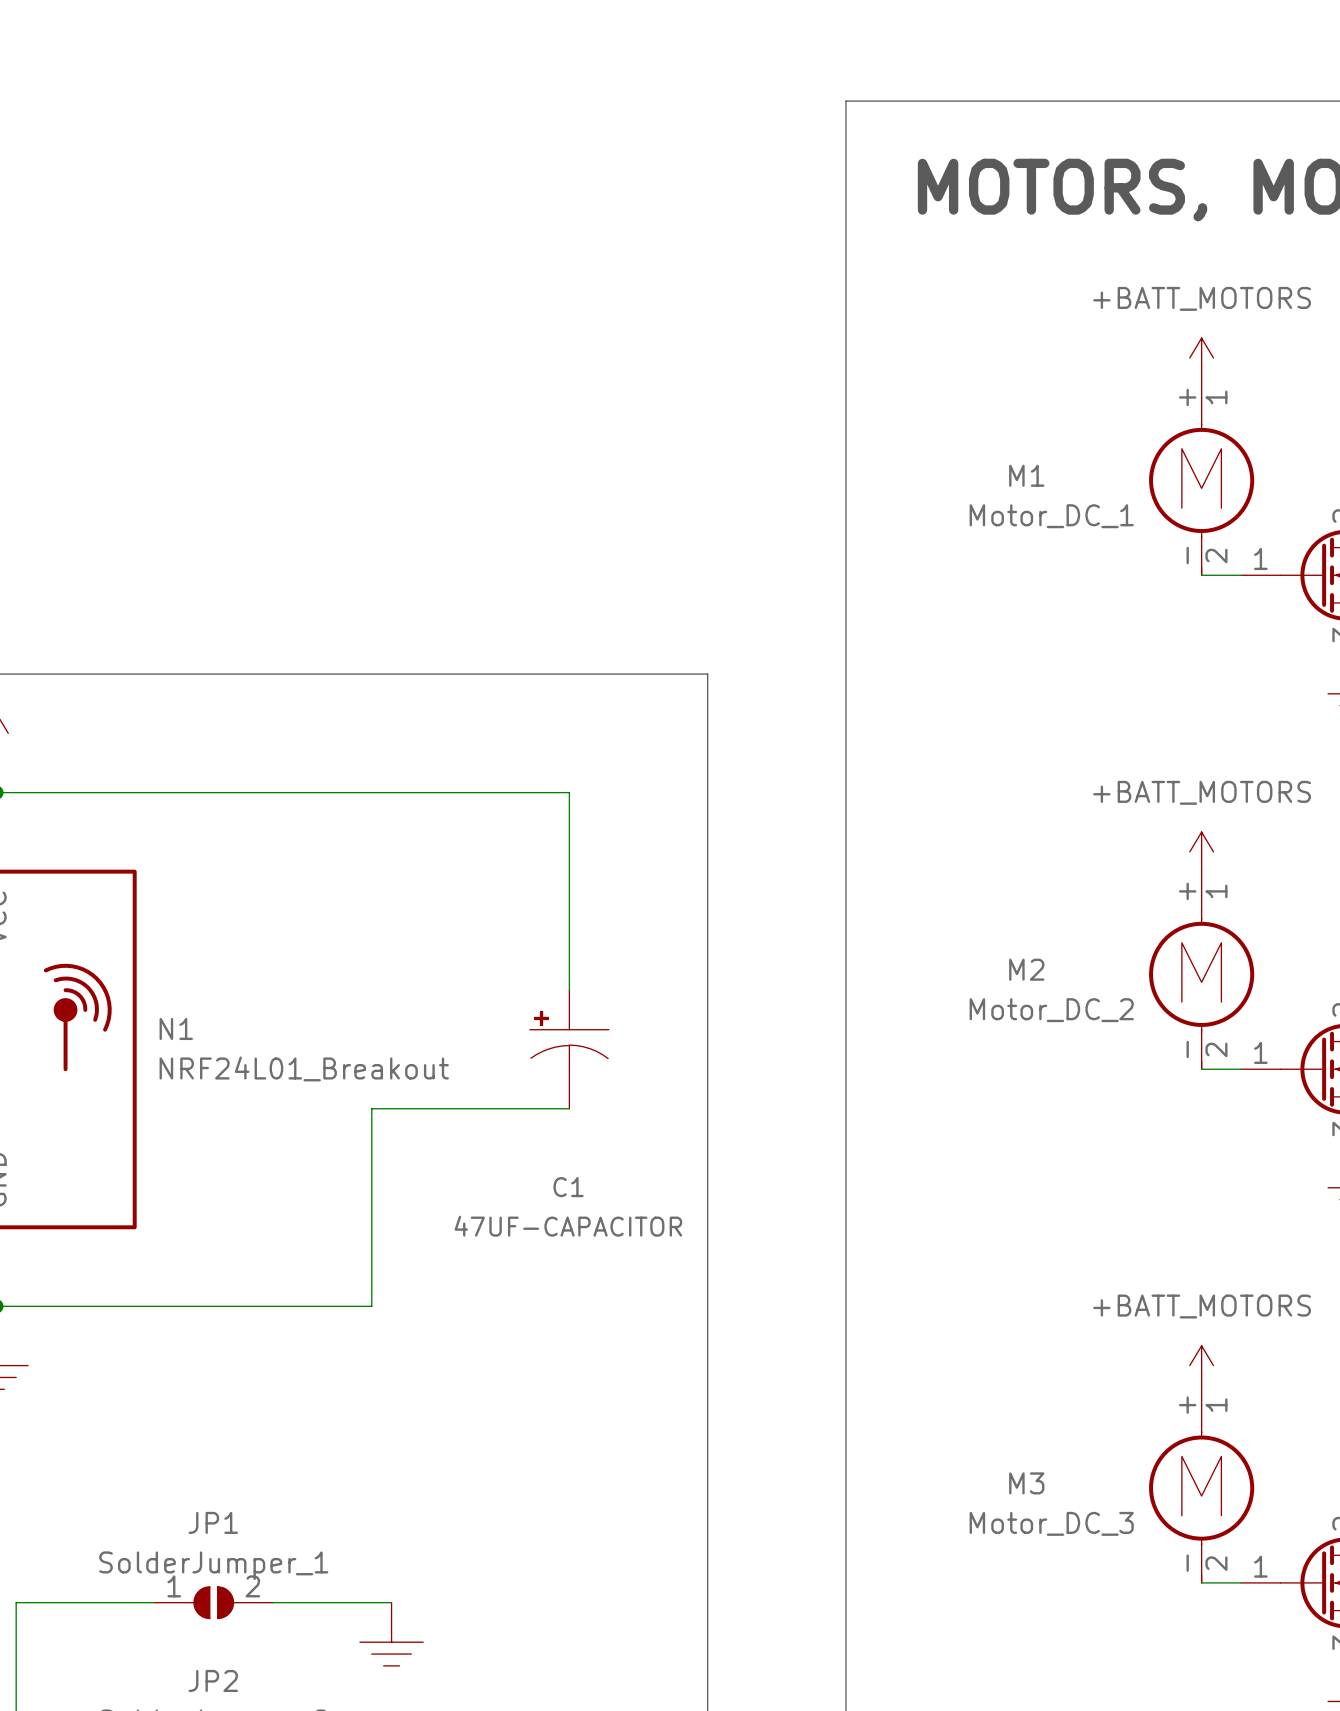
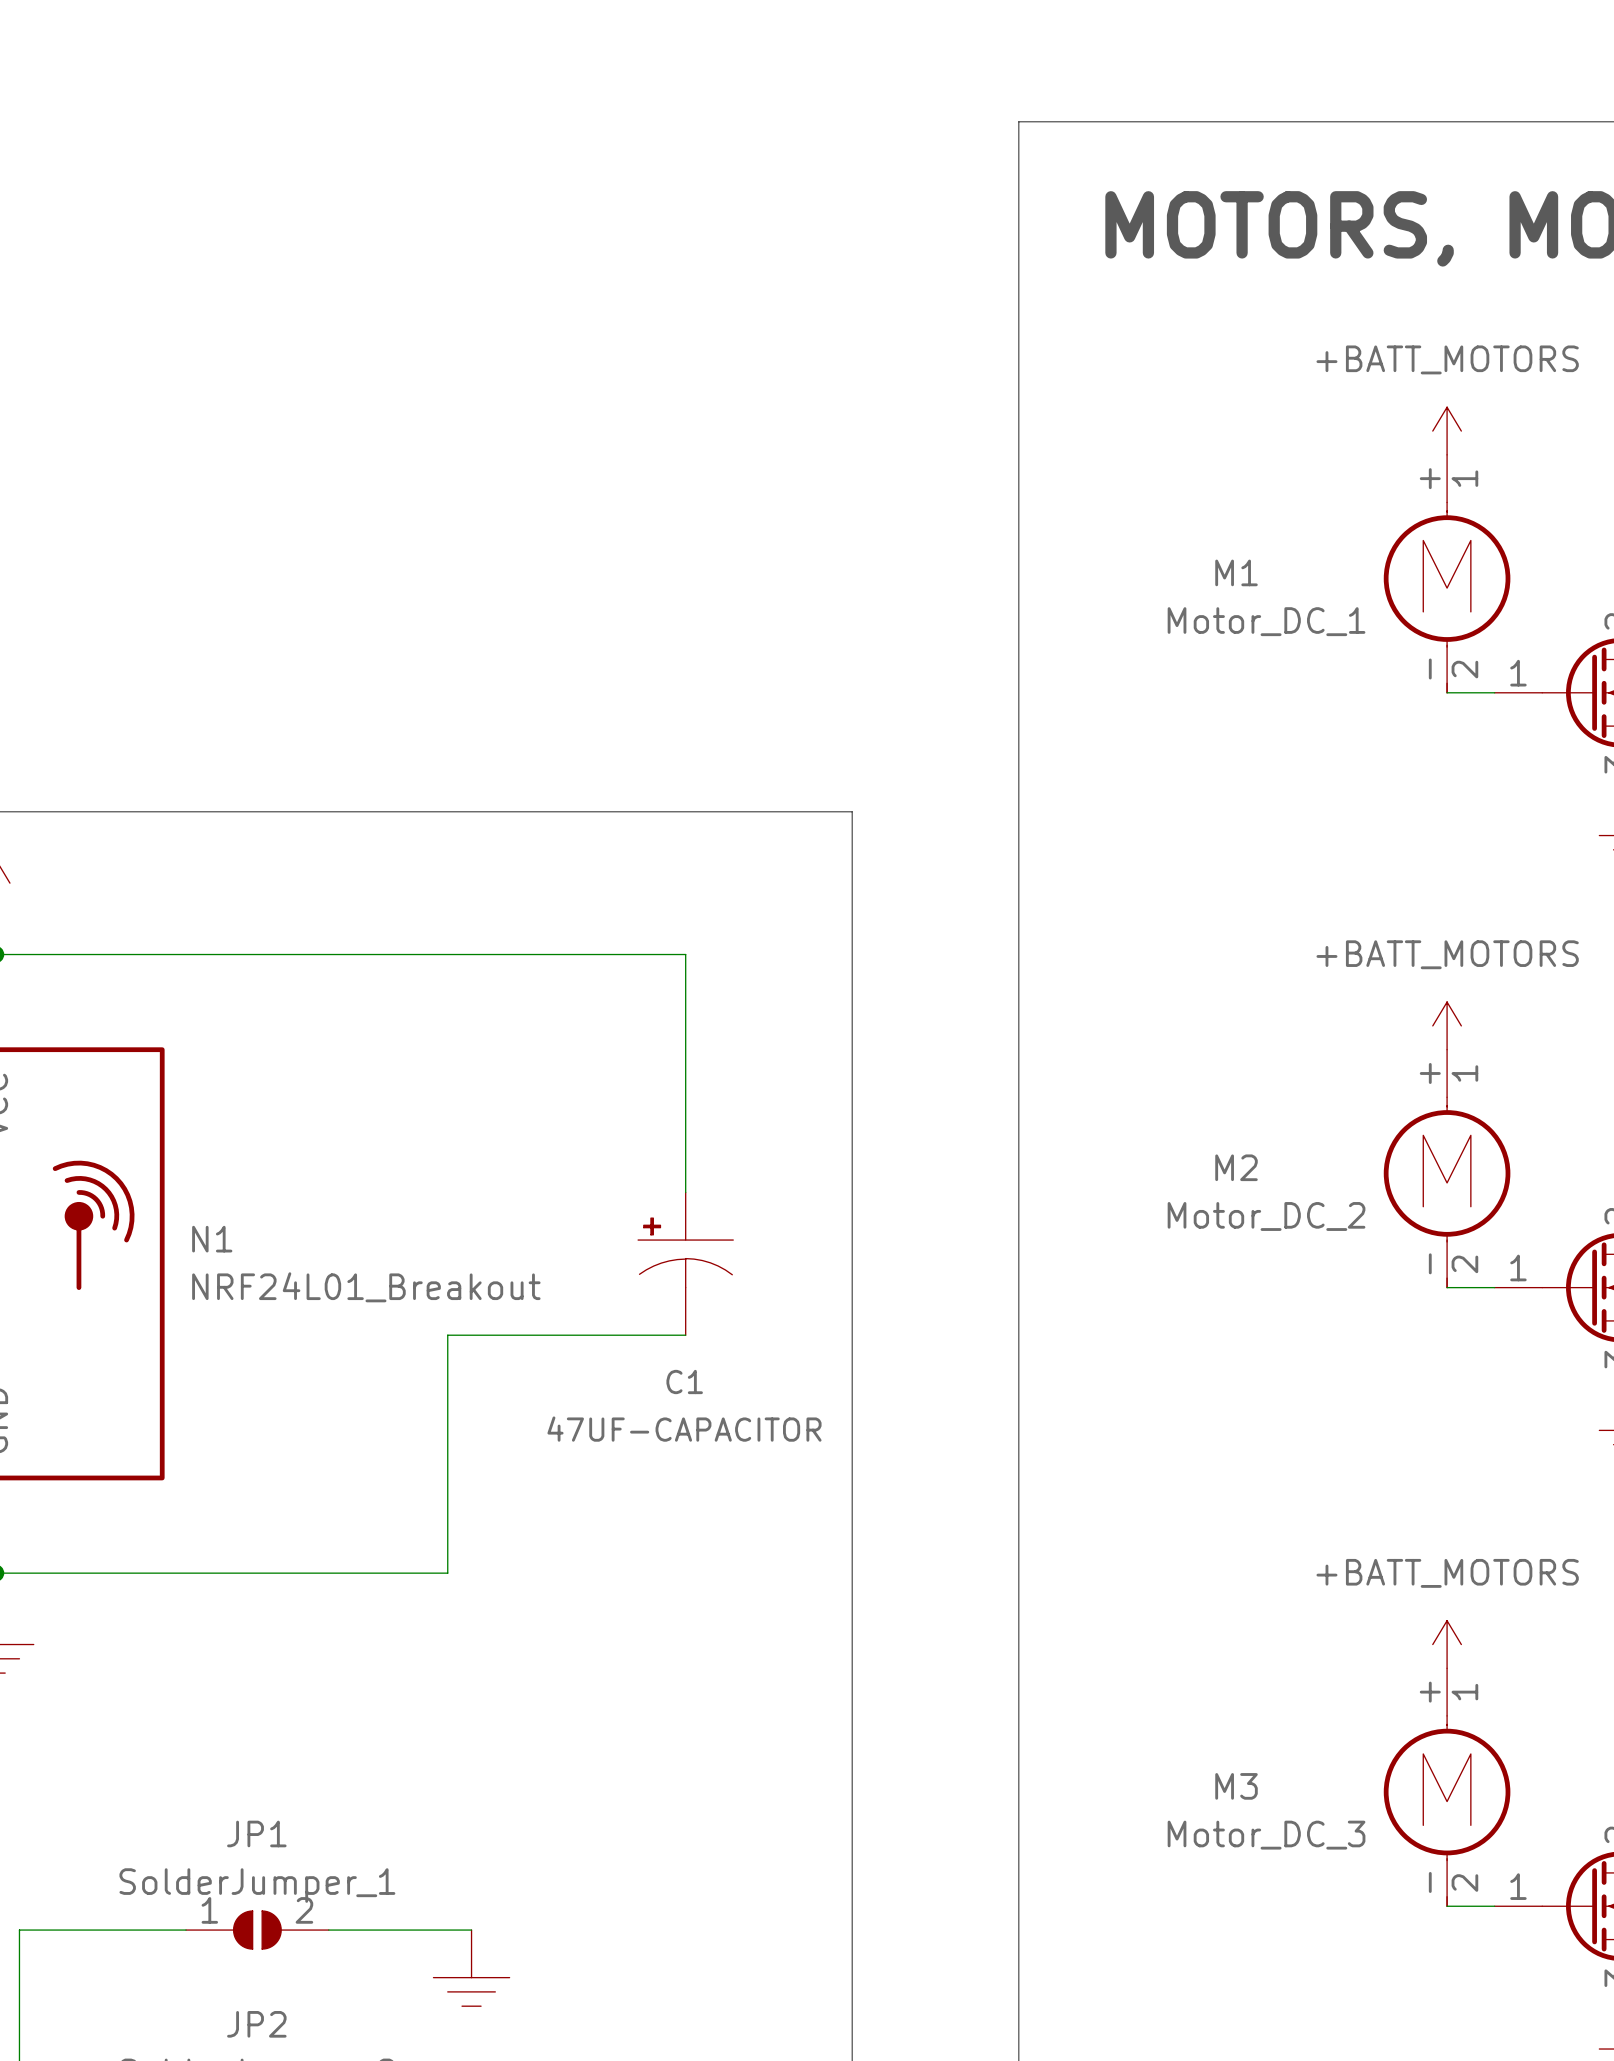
C1 name position: C1 (568, 1187) -> C1 (684, 1382)
C1 value position: 47UF-CAPACITOR (568, 1226) -> 47UF-CAPACITOR (684, 1429)

